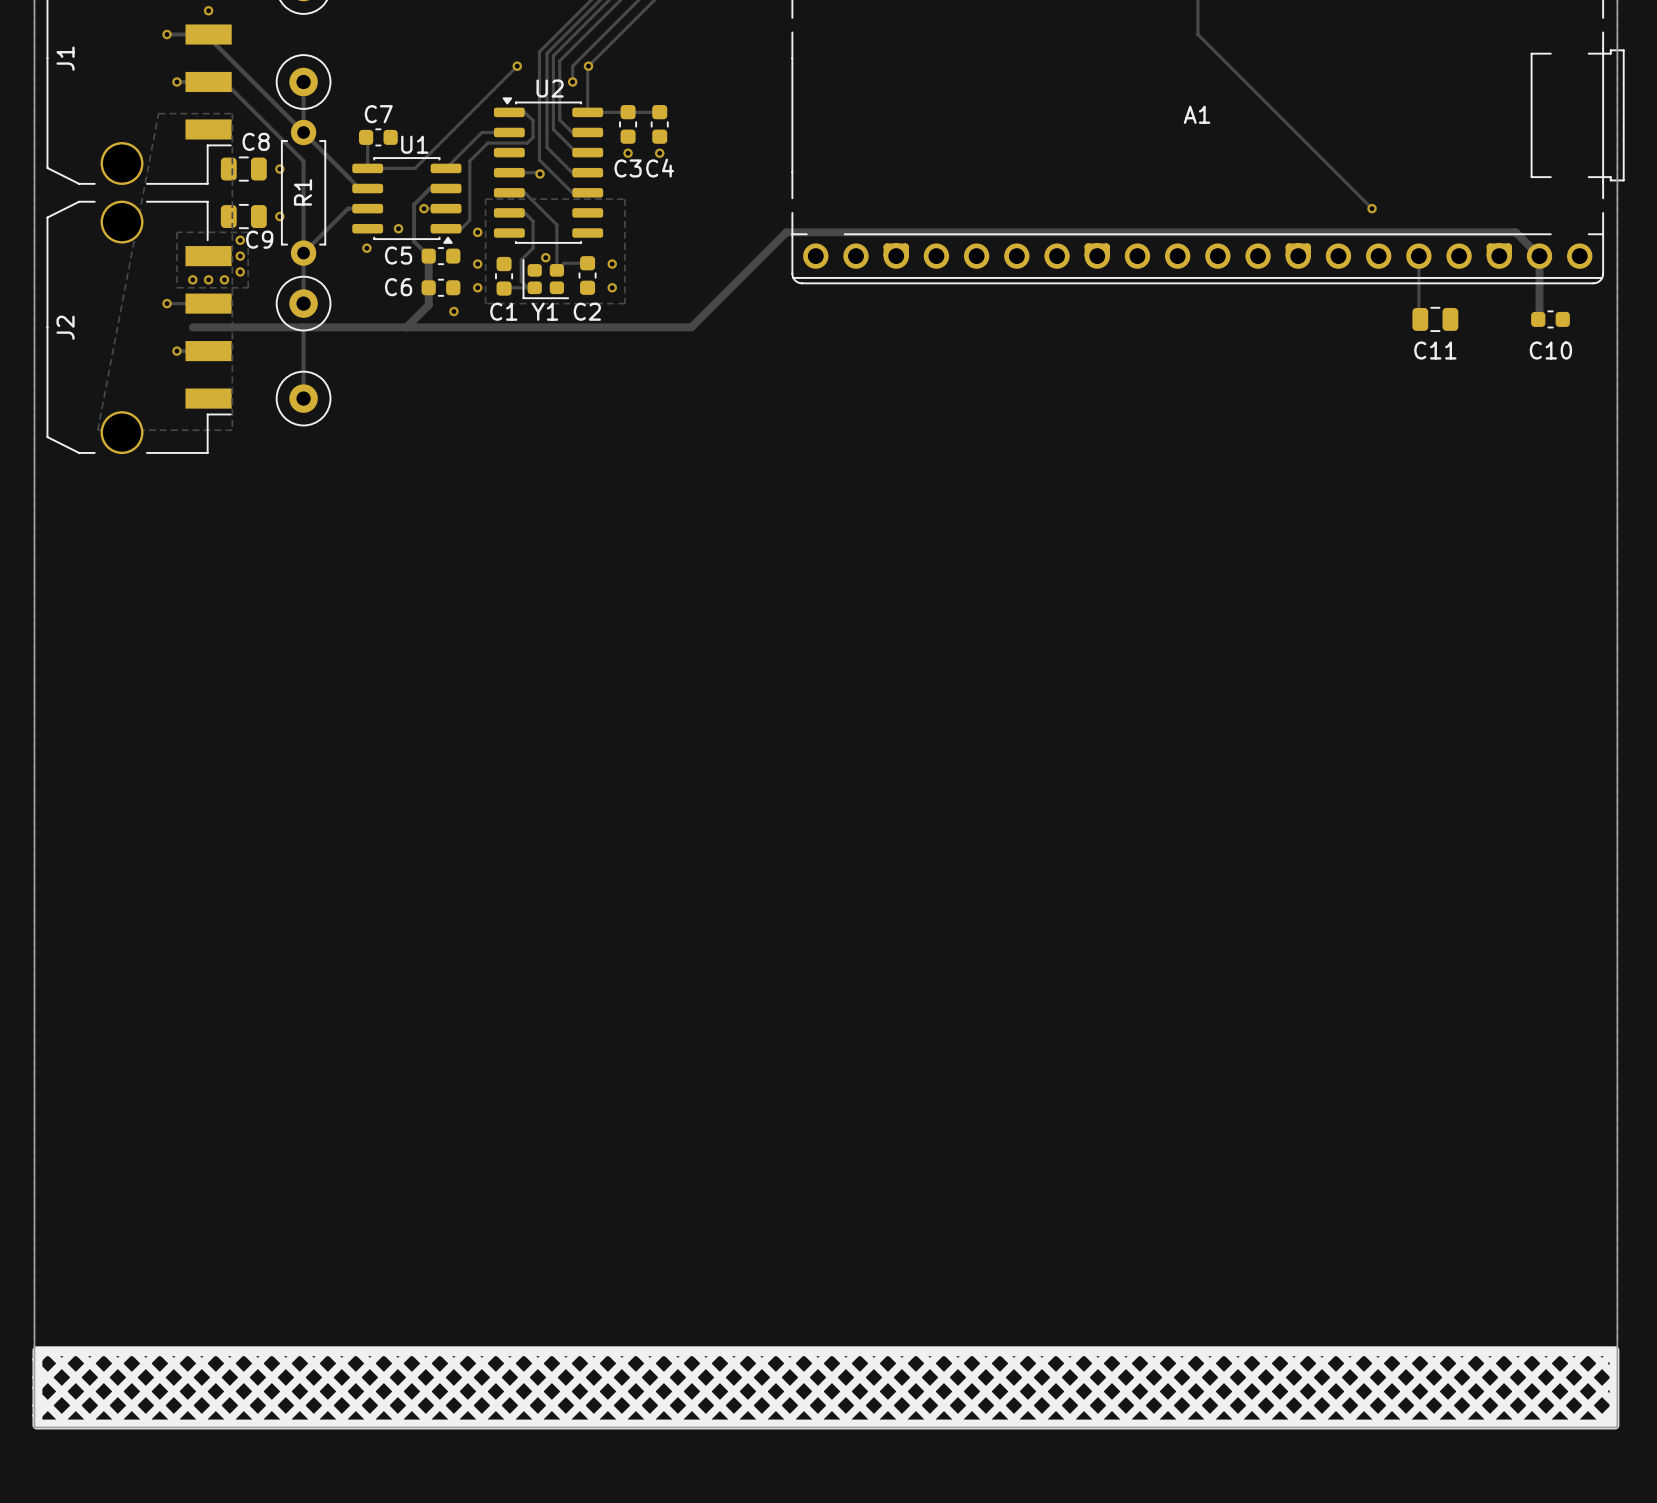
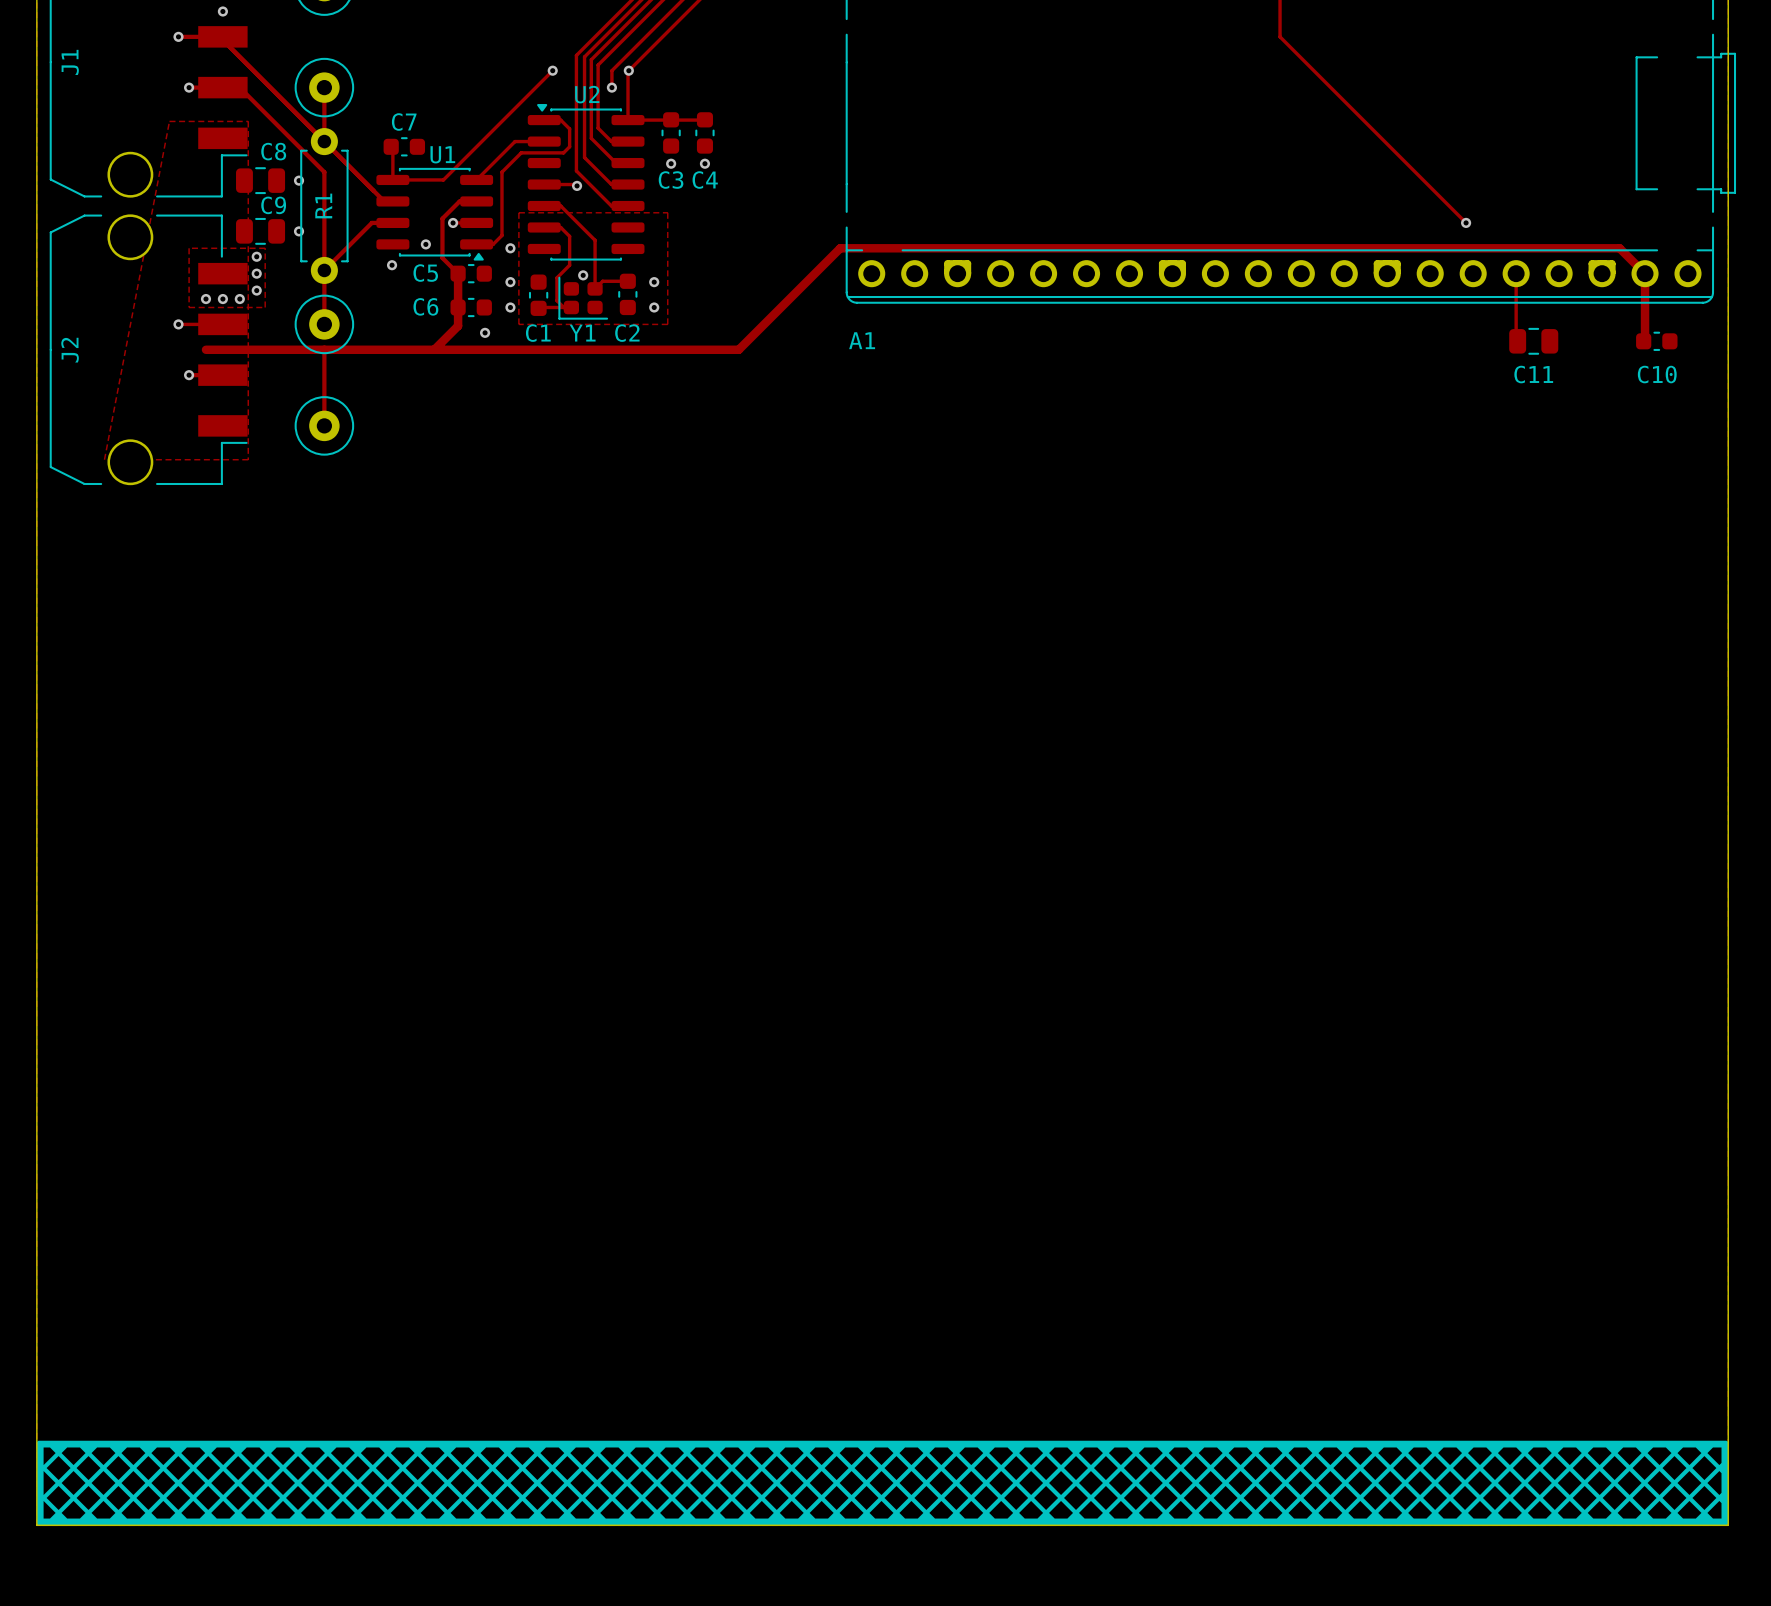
A1 name position: A1 (1197, 114) -> A1 (862, 340)
C9 name position: C9 (259, 239) -> C9 (273, 205)
drawing shape: [32, 1346, 1620, 1430] -> [36, 1440, 1729, 1526]

